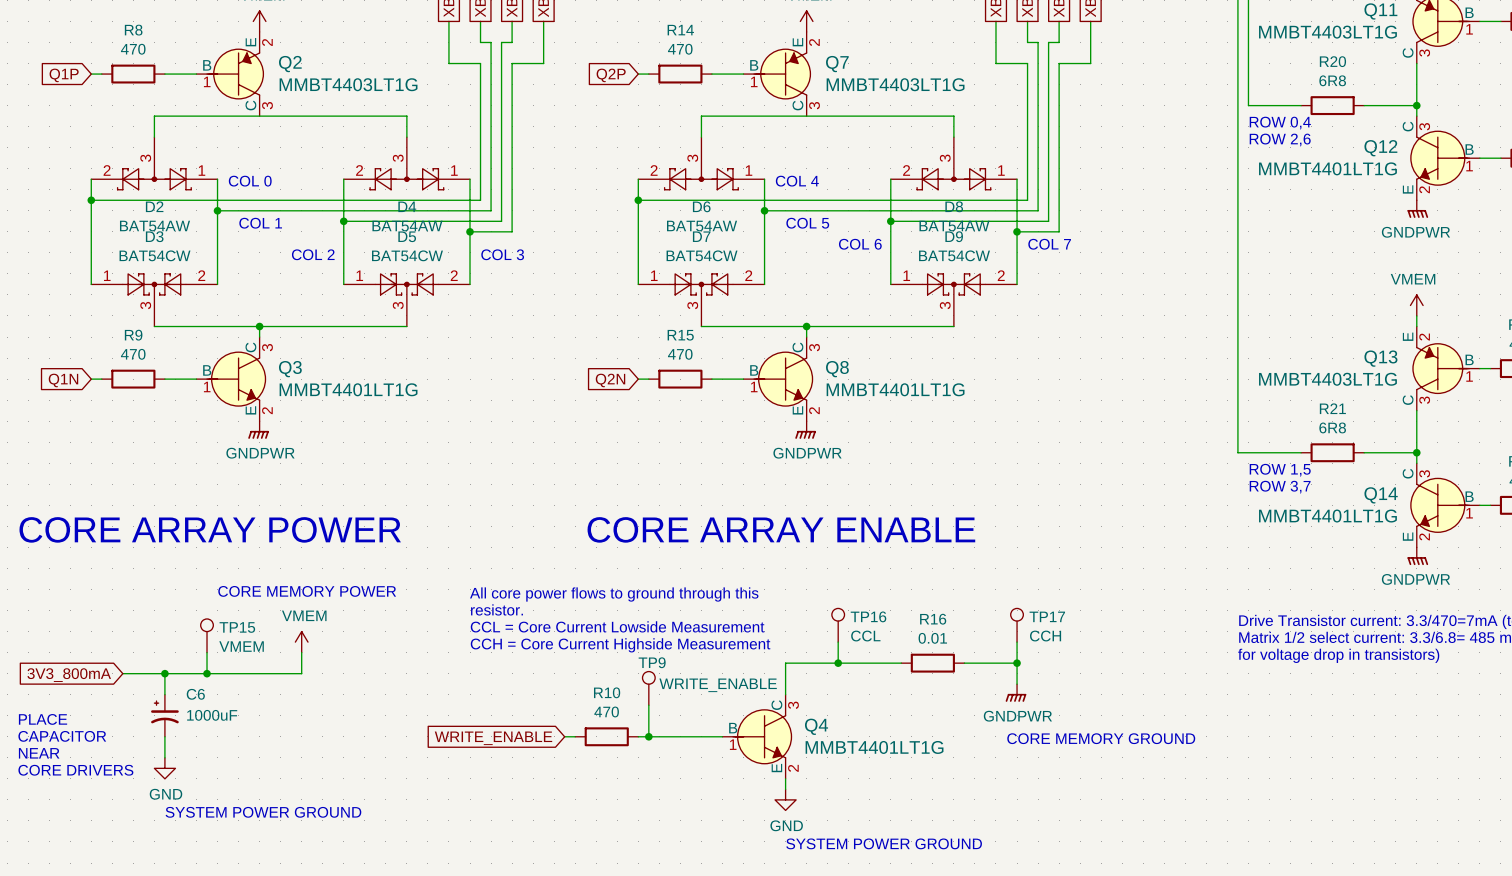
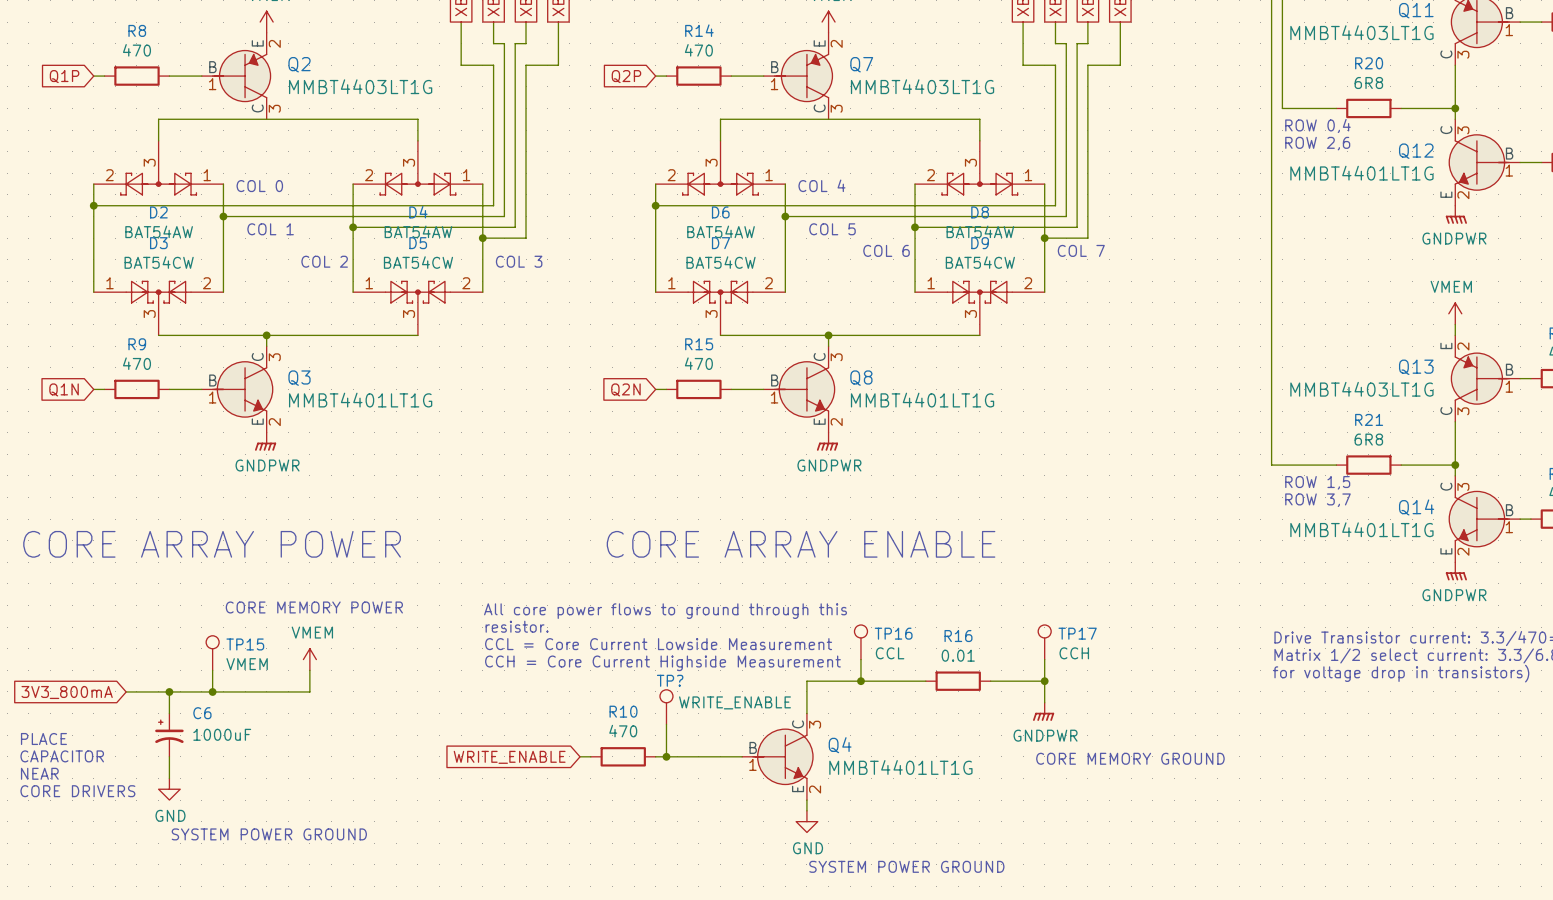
TP9 name: TP9 (652, 662) -> TP? (670, 680)

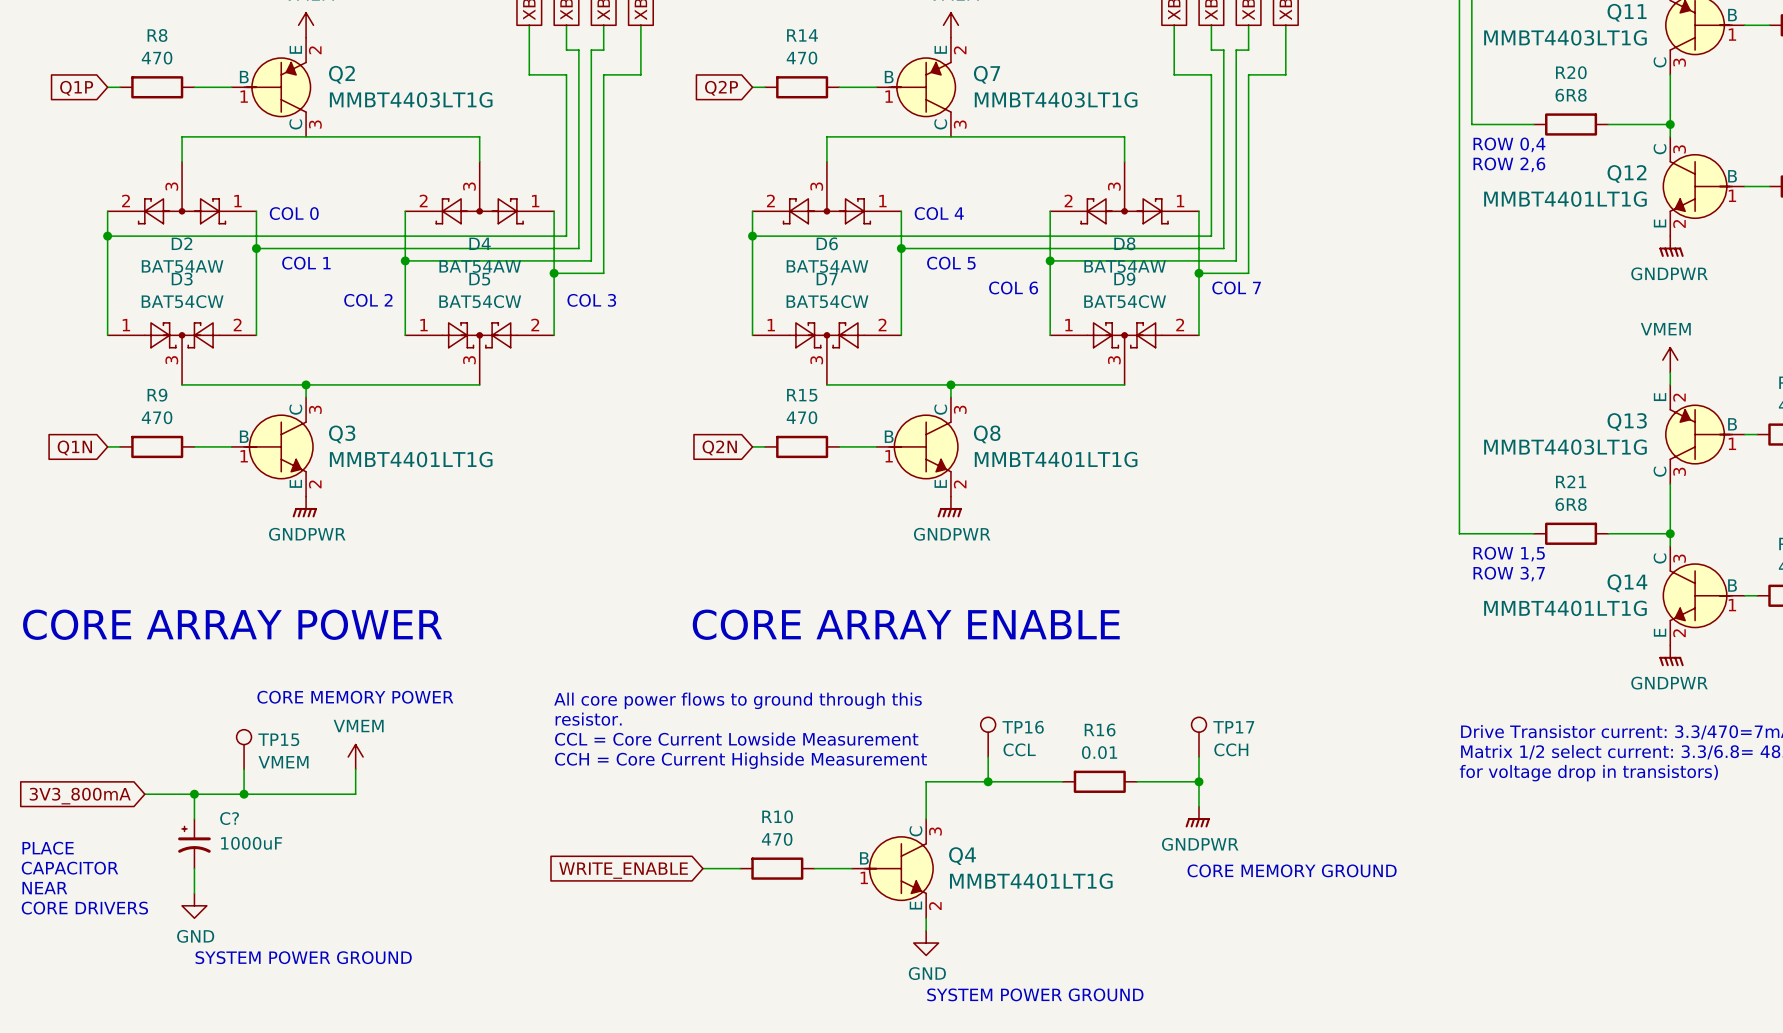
TP?: WRITE_ENABLE (666, 707) -> none
C6 name: C6 (202, 713) -> C? (229, 818)
wire: (666, 724) (666, 756) -> none
wire: (580, 756) (590, 756) -> none
wire: none -> (702, 868) (740, 868)
R10 position: (623, 756) -> (777, 868)
wire: (655, 756) (709, 756) -> none
junction: (666, 756) -> none
global label position: WRITE_ENABLE (509, 757) -> WRITE_ENABLE (623, 870)

